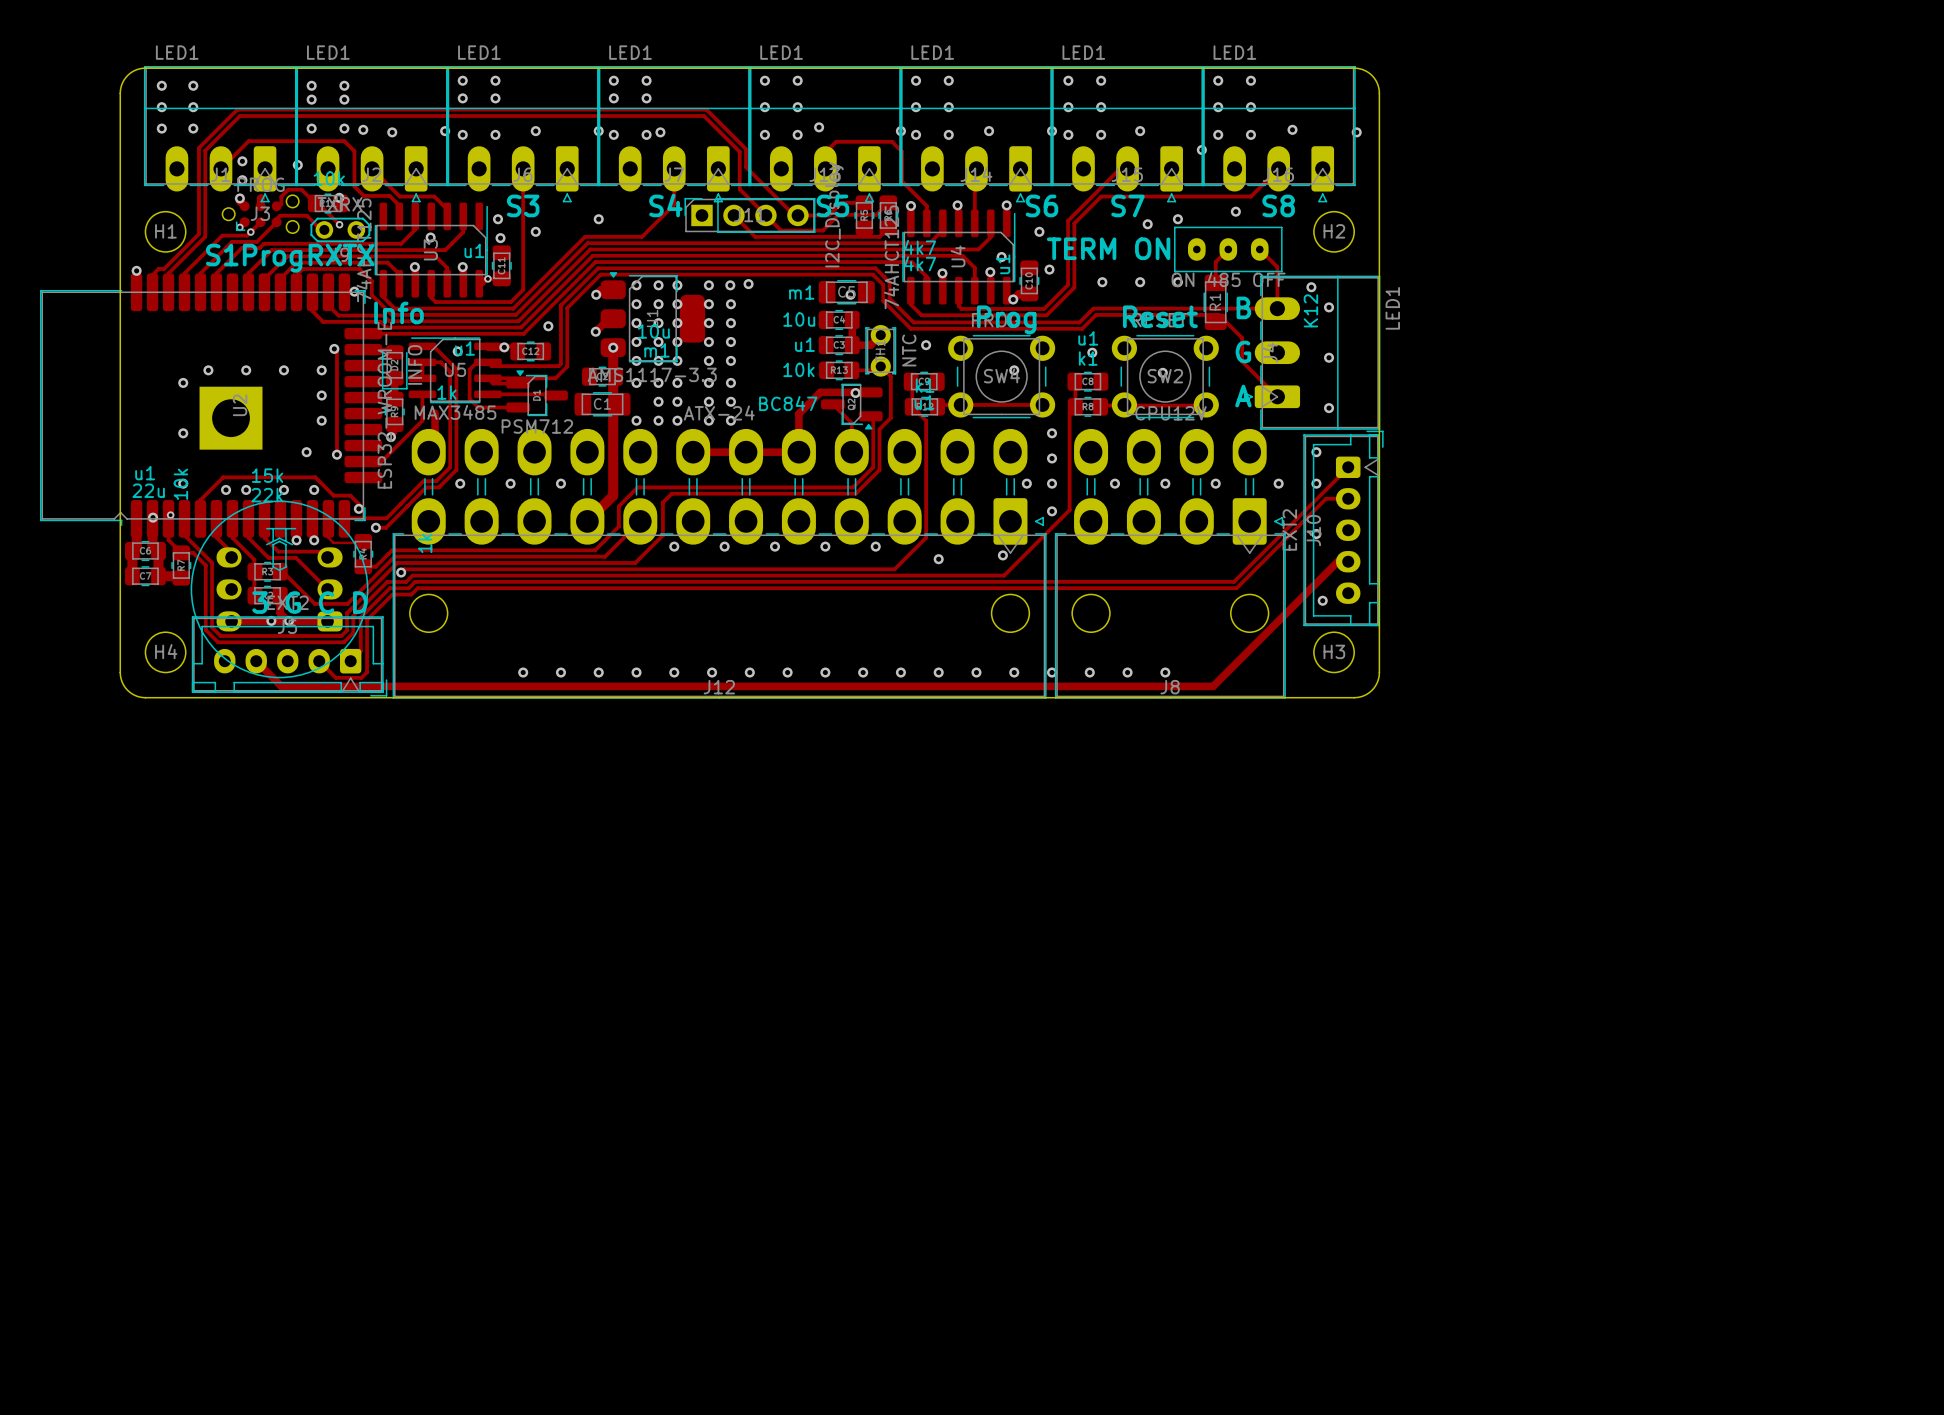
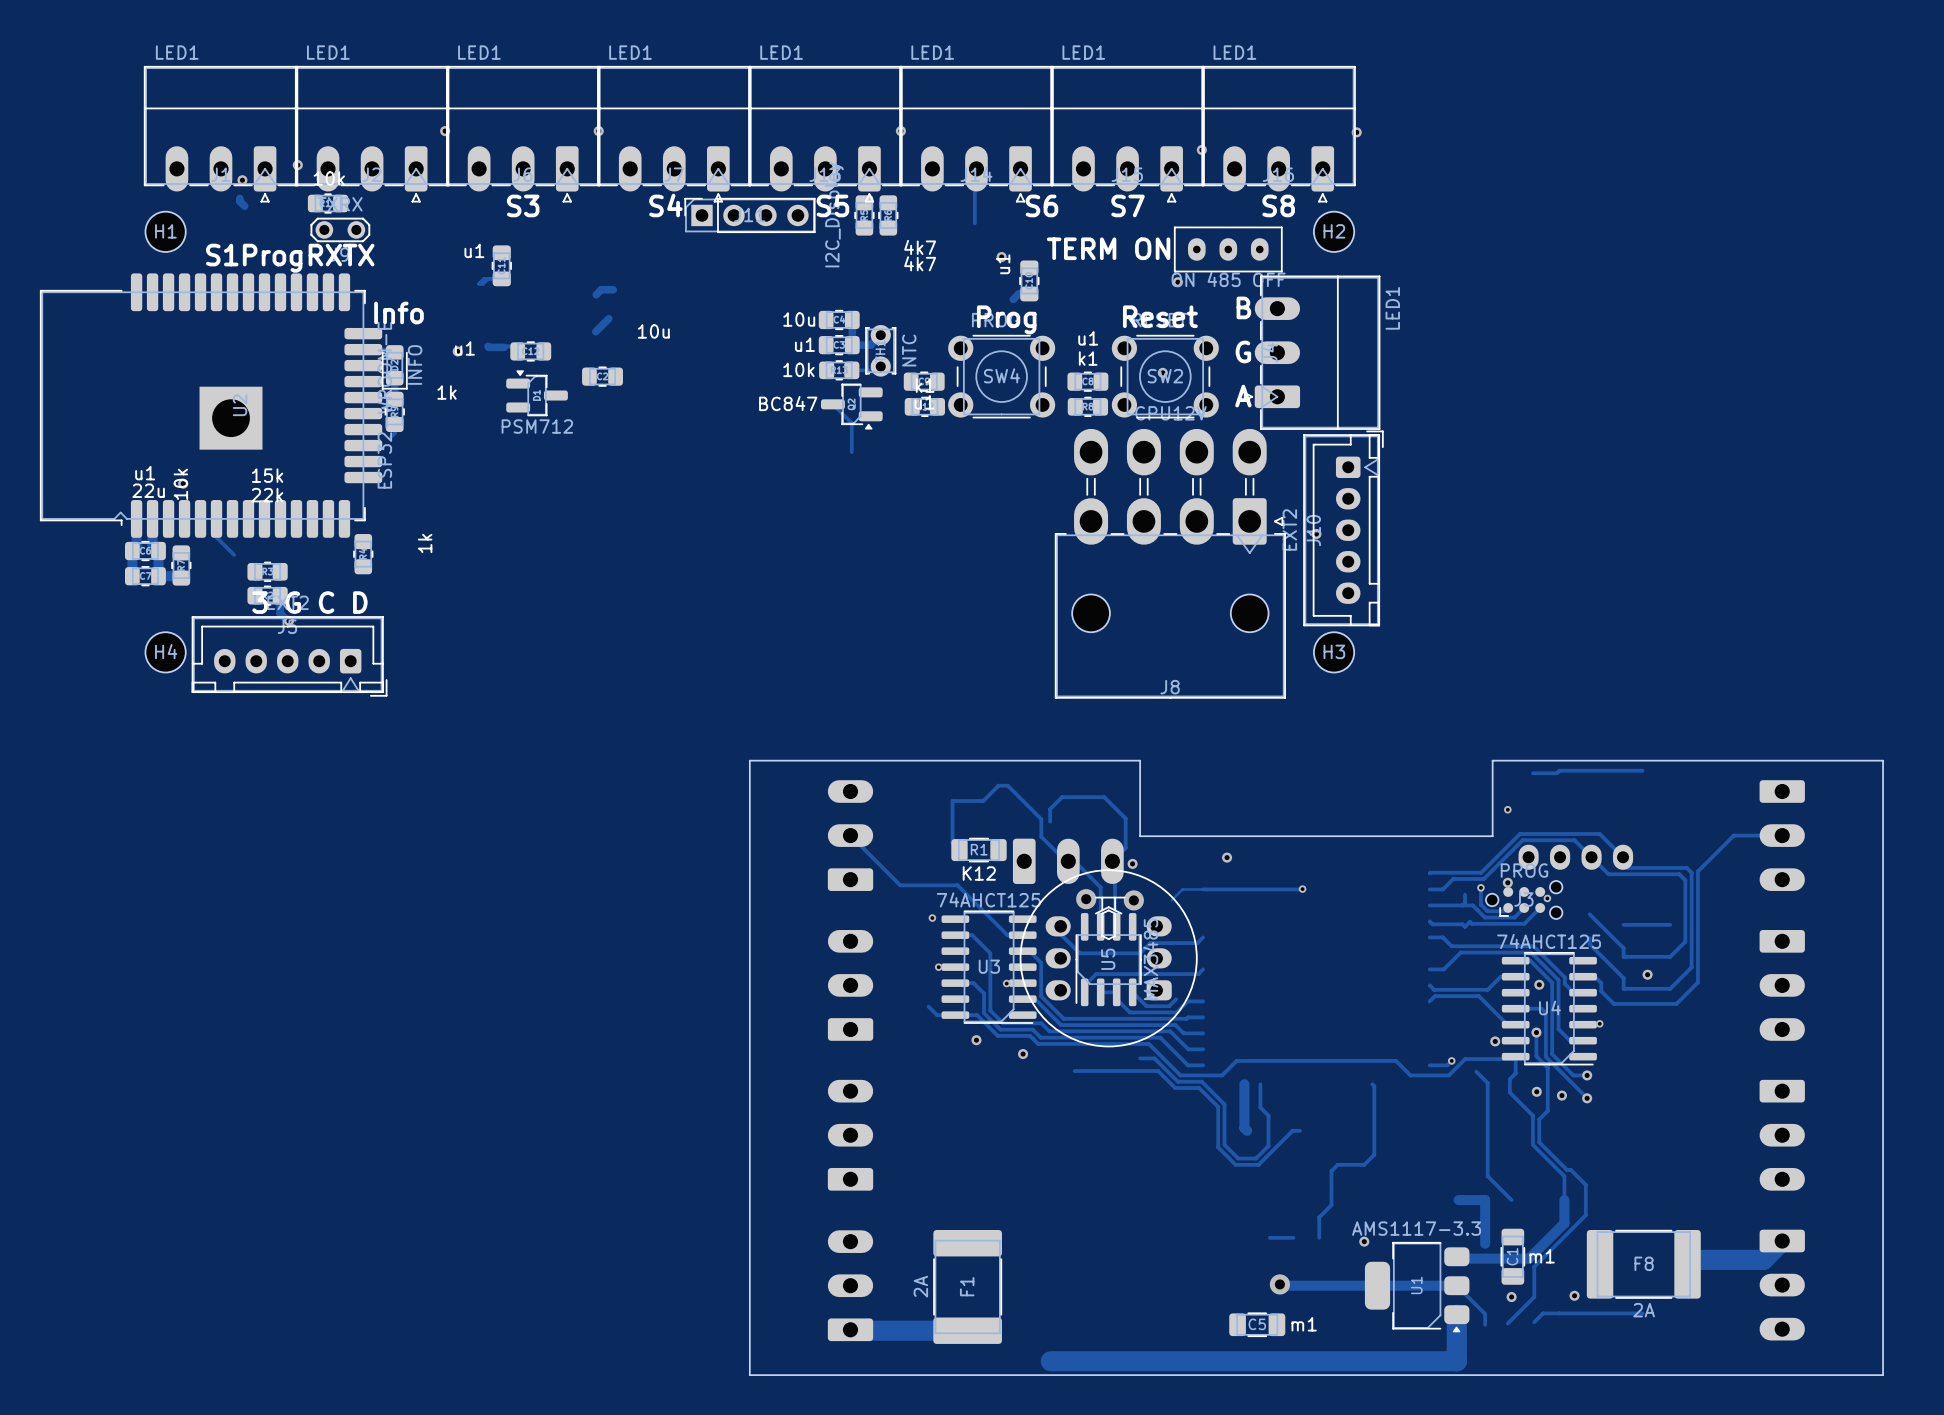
board edge: (145, 68) (1354, 68) (1365, 70) (1375, 79) (1379, 93) (1379, 672) (1376, 683) (1367, 693) (1354, 697) (145, 697) (134, 695) (124, 685) (120, 672) (120, 93) (121, 85) (127, 75) (137, 69) (145, 68) -> none
via: (462, 80) -> none
via: (495, 80) -> none
via: (613, 80) -> none
via: (646, 80) -> none
via: (764, 80) -> none
via: (797, 80) -> none
via: (916, 80) -> none
via: (948, 80) -> none
via: (1068, 80) -> none
via: (1101, 80) -> none
via: (1218, 80) -> none
via: (1250, 80) -> none
via: (161, 85) -> none
via: (193, 85) -> none
via: (311, 85) -> none
via: (344, 85) -> none
via: (462, 98) -> none
via: (495, 98) -> none
via: (613, 98) -> none
via: (646, 98) -> none
via: (311, 99) -> none
via: (344, 99) -> none
via: (161, 107) -> none
via: (193, 107) -> none
via: (764, 107) -> none
via: (797, 107) -> none
via: (916, 107) -> none
via: (948, 107) -> none
via: (1068, 107) -> none
via: (1101, 107) -> none
via: (1218, 107) -> none
via: (1250, 107) -> none
via: (819, 127) -> none
via: (161, 128) -> none
via: (193, 128) -> none
via: (311, 128) -> none
via: (344, 128) -> none
via: (363, 129) -> none
via: (1292, 129) -> none
via: (535, 131) -> none
via: (989, 131) -> none
via: (1052, 131) -> none
via: (1140, 131) -> none
via: (392, 132) -> none
via: (660, 132) -> none
via: (462, 134) -> none
via: (495, 134) -> none
via: (613, 134) -> none
via: (646, 134) -> none
via: (764, 134) -> none
via: (797, 134) -> none
via: (916, 134) -> none
via: (948, 134) -> none
via: (1068, 134) -> none
via: (1101, 134) -> none
via: (1218, 134) -> none
via: (1250, 134) -> none
track: (825, 152) (836, 141) (892, 141) (902, 151) (902, 181) (926, 206) (926, 223) -> none
via: (242, 161) -> none
track: (221, 168) (248, 141) (344, 141) (354, 151) (354, 186) (363, 195) (389, 195) (399, 205) -> none
track: (372, 168) (399, 196) (434, 196) (447, 209) -> none
track: (523, 168) (523, 289) (510, 302) (435, 302) (431, 297) (431, 283) -> none
track: (674, 168) (674, 204) (642, 236) (585, 236) (513, 308) (394, 308) (383, 297) (383, 283) -> none
track: (1120, 168) (1068, 220) (1068, 284) (1044, 308) (961, 308) (958, 306) (958, 290) -> none
track: (1278, 168) (1250, 196) (1101, 196) (1074, 223) (1074, 287) (1046, 315) (921, 315) (910, 304) (910, 290) -> none
track: (261, 197) (260, 206) -> none
via: (339, 197) -> none
via: (239, 198) -> none
track: (864, 202) (841, 202) (829, 215) (797, 215) -> none
track: (888, 202) (876, 214) (838, 214) (822, 230) (781, 230) (739, 189) (739, 151) (703, 115) (239, 115) (205, 150) (205, 236) (168, 273) (168, 292) -> none
track: (315, 203) (301, 189) (288, 189) (281, 196) (281, 204) (279, 206) -> none
track: (318, 203) (339, 224) -> none
via: (957, 205) -> none
via: (1006, 205) -> none
via: (911, 206) -> none
via: (1235, 211) -> none
J3 position: (260, 214) -> (1524, 899)
track: (733, 215) (755, 236) (879, 236) (888, 228) -> none
track: (794, 215) (746, 167) (746, 149) (706, 109) (237, 109) (198, 148) (198, 234) (164, 268) (158, 268) (152, 275) (152, 292) -> none
track: (415, 216) (415, 229) (401, 243) (263, 243) (259, 248) (241, 248) (216, 273) (216, 292) -> none
track: (463, 216) (463, 232) (445, 250) (271, 250) (248, 273) (248, 292) -> none
via: (498, 219) -> none
via: (598, 219) -> none
via: (1177, 219) -> none
track: (260, 222) (247, 235) (222, 235) (184, 273) (184, 292) -> none
track: (273, 222) (279, 215) (306, 215) (321, 229) -> none
track: (276, 222) (256, 241) (232, 241) (200, 273) (200, 292) -> none
track: (990, 223) (990, 237) (978, 249) (590, 249) (518, 321) (389, 321) (383, 315) (338, 315) (328, 305) -> none
via: (339, 224) -> none
via: (1147, 224) -> none
via: (239, 227) -> none
track: (942, 230) (929, 243) (587, 243) (515, 314) (391, 314) (371, 295) (371, 281) (359, 268) (302, 268) (296, 275) -> none
via: (535, 231) -> none
via: (1039, 231) -> none
via: (250, 232) -> none
via: (430, 237) -> none
via: (500, 238) -> none
track: (1228, 249) (1215, 262) (1215, 282) -> none
track: (1259, 249) (1277, 267) (1277, 308) (1093, 308) (1079, 322) (913, 322) (889, 298) (889, 282) (875, 268) (598, 268) (560, 305) (560, 363) (558, 366) (491, 366) (487, 362) -> none
U3 rotation: 0° (431, 250) -> 90° clockwise (989, 967)
U3 position: (431, 250) -> (989, 967)
U4 rotation: 0° (958, 257) -> 90° clockwise (1549, 1008)
U4 position: (958, 257) -> (1549, 1008)
via: (414, 267) -> none
via: (462, 267) -> none
via: (1049, 269) -> none
via: (136, 270) -> none
via: (990, 272) -> none
track: (398, 273) (387, 262) (296, 262) (280, 278) -> none
via: (942, 273) -> none
via: (487, 278) -> none
track: (264, 279) (287, 256) (435, 256) (447, 267) (447, 283) -> none
via: (1102, 282) -> none
via: (1140, 282) -> none
via: (748, 284) -> none
via: (636, 285) -> none
via: (658, 285) -> none
via: (677, 285) -> none
via: (708, 285) -> none
via: (730, 285) -> none
via: (1311, 287) -> none
track: (926, 290) (926, 276) (912, 262) (595, 262) (523, 333) (363, 333) -> none
track: (974, 290) (974, 267) (962, 255) (592, 255) (521, 327) (386, 327) (380, 321) (323, 321) (312, 311) (312, 292) -> none
via: (354, 291) -> none
C5 value position: m1 (801, 292) -> m1 (1304, 1324)
C5 position: (846, 292) -> (1257, 1324)
via: (596, 294) -> none
via: (850, 294) -> none
via: (1013, 299) -> none
R1 rotation: 0° (1215, 302) -> 90° clockwise (978, 850)
R1 position: (1215, 302) -> (978, 850)
via: (636, 304) -> none
via: (658, 304) -> none
via: (677, 304) -> none
via: (708, 304) -> none
via: (730, 304) -> none
via: (1329, 307) -> none
R1 value position: K12 (1310, 310) -> K12 (979, 873)
U1 rotation: 0° (652, 317) -> 180° (1417, 1287)
U1 position: (652, 317) -> (1417, 1287)
via: (636, 323) -> none
via: (658, 323) -> none
via: (677, 323) -> none
via: (708, 323) -> none
via: (730, 323) -> none
via: (548, 326) -> none
via: (595, 331) -> none
via: (636, 342) -> none
via: (658, 342) -> none
via: (677, 342) -> none
via: (708, 342) -> none
via: (730, 342) -> none
via: (926, 345) -> none
track: (433, 346) (456, 369) (456, 469) (438, 487) (426, 487) (407, 506) -> none
via: (504, 347) -> none
track: (613, 347) (613, 495) (587, 521) -> none
via: (613, 347) -> none
track: (334, 348) (336, 351) (336, 454) -> none
via: (334, 348) -> none
C1 value position: m1 (656, 350) -> m1 (1542, 1256)
via: (1092, 352) -> none
via: (1329, 357) -> none
via: (636, 360) -> none
via: (658, 360) -> none
via: (677, 360) -> none
via: (708, 360) -> none
via: (730, 360) -> none
track: (477, 362) (469, 369) (469, 398) (478, 407) (518, 407) -> none
track: (880, 366) (890, 376) (890, 417) (879, 429) (879, 469) (855, 493) (671, 493) (662, 502) (662, 535) (635, 562) (397, 562) (350, 610) -> none
via: (208, 370) -> none
via: (246, 370) -> none
via: (283, 370) -> none
via: (321, 370) -> none
U5 rotation: 0° (455, 370) -> 90° counterclockwise (1108, 959)
U5 position: (455, 370) -> (1108, 959)
via: (1014, 370) -> none
track: (422, 378) (422, 362) (440, 362) (450, 371) (450, 467) (436, 481) (423, 481) (401, 503) -> none
via: (183, 382) -> none
via: (636, 382) -> none
via: (658, 382) -> none
via: (677, 382) -> none
via: (708, 382) -> none
via: (730, 382) -> none
track: (912, 382) (912, 406) (926, 420) (926, 537) (894, 569) (404, 569) (401, 572) -> none
track: (1075, 382) (1075, 406) (1069, 412) (1069, 510) (1004, 575) (412, 575) (406, 581) (387, 581) (353, 615) (353, 632) (343, 642) (218, 642) (205, 630) (205, 565) (193, 552) (181, 552) (168, 540) (168, 518) -> none
track: (518, 383) (493, 383) (487, 378) (555, 378) (567, 366) (567, 308) (600, 274) (872, 274) (883, 284) (883, 301) (911, 328) (1082, 328) (1096, 314) (1219, 314) (1242, 338) (1242, 361) (1277, 396) -> none
track: (870, 392) (820, 392) (798, 413) (798, 452) (693, 452) -> none
via: (855, 393) -> none
track: (422, 394) (422, 420) (381, 461) (363, 461) -> none
track: (487, 394) (554, 394) -> none
via: (321, 395) -> none
via: (658, 401) -> none
via: (677, 401) -> none
via: (708, 401) -> none
via: (730, 401) -> none
C1 rotation: 0° (602, 404) -> 90° clockwise (1512, 1256)
C1 position: (602, 404) -> (1512, 1256)
track: (939, 404) (1042, 404) -> none
track: (1101, 405) (1216, 405) -> none
via: (1329, 408) -> none
track: (435, 413) (435, 445) -> none
track: (873, 418) (873, 467) (853, 487) (637, 487) (618, 506) (618, 526) (595, 550) (392, 550) (375, 566) (363, 566) -> none
via: (321, 420) -> none
via: (636, 420) -> none
via: (658, 420) -> none
via: (677, 420) -> none
via: (708, 420) -> none
via: (730, 420) -> none
via: (183, 433) -> none
via: (1052, 433) -> none
via: (390, 437) -> none
via: (306, 452) -> none
via: (1316, 452) -> none
via: (336, 454) -> none
via: (1052, 458) -> none
track: (1348, 467) (1234, 581) (415, 581) (408, 588) (389, 588) (360, 617) (360, 651) (350, 661) -> none
via: (460, 483) -> none
via: (510, 483) -> none
via: (560, 483) -> none
via: (1026, 483) -> none
via: (1052, 483) -> none
via: (1114, 483) -> none
via: (1165, 483) -> none
via: (1215, 483) -> none
via: (1278, 483) -> none
via: (1316, 483) -> none
via: (226, 489) -> none
via: (246, 489) -> none
via: (283, 489) -> none
via: (314, 489) -> none
track: (1348, 498) (1326, 498) (1236, 588) (417, 588) (411, 594) (392, 594) (367, 619) (367, 672) (361, 677) (335, 677) (319, 661) -> none
track: (401, 503) (386, 518) (345, 518) -> none
track: (407, 506) (386, 527) (375, 527) -> none
track: (358, 508) (358, 504) (350, 495) (333, 495) (315, 477) (223, 477) (200, 500) (200, 518) -> none
via: (358, 508) -> none
via: (1052, 511) -> none
via: (170, 515) -> none
via: (153, 517) -> none
track: (232, 518) (232, 537) (254, 559) (254, 588) -> none
track: (248, 518) (248, 537) (268, 557) (296, 557) (327, 589) -> none
track: (264, 518) (264, 537) (278, 551) (321, 551) (327, 557) -> none
track: (328, 518) (328, 537) (333, 542) (363, 541) -> none
track: (640, 521) (605, 556) (394, 556) (347, 603) (314, 603) (282, 571) (280, 571) -> none
via: (375, 527) -> none
track: (184, 535) (212, 562) (212, 627) (220, 636) (341, 636) (347, 630) (347, 613) (350, 610) -> none
via: (296, 540) -> none
via: (314, 540) -> none
via: (674, 546) -> none
via: (724, 546) -> none
via: (775, 546) -> none
via: (825, 546) -> none
via: (875, 546) -> none
via: (1002, 555) -> none
via: (938, 559) -> none
track: (1348, 561) (1337, 561) (1213, 686) (281, 686) (256, 661) -> none
J12: ATX-24 (719, 563) -> none
via: (401, 572) -> none
part: (279, 589) -> none
via: (1322, 600) -> none
via: (271, 620) -> none
track: (231, 621) (327, 621) -> none
via: (523, 672) -> none
via: (560, 672) -> none
via: (598, 672) -> none
via: (636, 672) -> none
via: (674, 672) -> none
via: (712, 672) -> none
via: (749, 672) -> none
via: (787, 672) -> none
via: (825, 672) -> none
via: (863, 672) -> none
via: (900, 672) -> none
via: (938, 672) -> none
via: (976, 672) -> none
via: (1014, 672) -> none
via: (1052, 672) -> none
via: (1089, 672) -> none
via: (1127, 672) -> none
via: (1165, 672) -> none
board edge: none -> (749, 760) (1140, 760) (1140, 836) (1492, 836) (1492, 760) (1883, 760) (1883, 1375) (749, 1375) (749, 760)
track: none -> (1642, 770) (1559, 770) (1556, 773) (1533, 773)
via: none -> (1507, 809)
track: none -> (1050, 821) (1050, 809) (1062, 797) (1104, 797) (1125, 818) (1125, 848) (1112, 861) (1114, 863) (1114, 925) (1116, 926)
track: none -> (850, 835) (900, 885) (957, 885) (1007, 935) (1022, 935)
part: none -> (850, 835)
track: none -> (1782, 835) (1733, 835) (1697, 871) (1697, 982) (1676, 1003) (1613, 1003) (1601, 991) (1601, 983) (1594, 976) (1583, 976)
part: none -> (1782, 835)
track: none -> (959, 850) (952, 843) (952, 800) (983, 800) (998, 785) (1007, 785) (1041, 819) (1041, 836) (1065, 861) (1074, 861) (1100, 887) (1100, 926)
via: none -> (1227, 857)
part: none -> (1575, 857)
part: none -> (1068, 861)
via: none -> (1132, 863)
track: none -> (1429, 873) (1481, 872) (1519, 833) (1599, 833) (1623, 857) (1623, 863) (1627, 867) (1686, 867) (1691, 872) (1691, 967) (1670, 988) (1623, 988) (1623, 978) (1589, 944) (1589, 938)
via: none -> (1507, 882)
track: none -> (1480, 887) (1480, 904) (1487, 911) (1504, 911) (1508, 907)
via: none -> (1480, 887)
track: none -> (1302, 889) (1182, 889) (1171, 900)
via: none -> (1302, 889)
track: none -> (1429, 889) (1442, 889) (1453, 879) (1483, 879) (1522, 840) (1574, 840) (1608, 874) (1679, 874) (1685, 880) (1685, 941) (1670, 956) (1623, 956) (1623, 948) (1589, 914)
track: none -> (1465, 894) (1465, 902) (1462, 905)
via: none -> (1547, 898)
via: none -> (1086, 899)
via: none -> (1133, 900)
track: none -> (1429, 905) (1472, 905) (1484, 917) (1514, 917) (1524, 907)
track: none -> (1540, 907) (1524, 923) (1471, 923) (1469, 921) (1465, 926) (1462, 924) (1432, 924) (1429, 921)
via: none -> (932, 918)
track: none -> (1623, 924) (1670, 924)
track: none -> (1060, 926) (1060, 934) (1079, 953) (1140, 953) (1150, 943) (1197, 943) (1203, 937)
track: none -> (955, 935) (972, 935) (990, 953) (990, 1010) (1003, 1023) (1041, 1023) (1049, 1031) (1170, 1031) (1188, 1049) (1203, 1049)
track: none -> (1429, 937) (1442, 937) (1451, 946) (1533, 946) (1564, 977) (1564, 983) (1573, 992) (1583, 992)
track: none -> (1022, 951) (1029, 951) (1041, 962) (1041, 996) (1063, 1018) (1203, 1017)
part: none -> (1108, 958)
track: none -> (1515, 960) (1530, 960) (1552, 982) (1552, 1054) (1573, 1075) (1587, 1075)
via: none -> (938, 967)
track: none -> (1203, 969) (1198, 974) (1096, 974) (1084, 985) (1084, 992)
track: none -> (1429, 969) (1443, 969) (1460, 952) (1530, 952) (1558, 980) (1558, 1029) (1570, 1040) (1583, 1040)
via: none -> (1647, 974)
track: none -> (1515, 976) (1500, 976) (1487, 989) (1434, 989) (1429, 985)
track: none -> (955, 983) (973, 983) (984, 993) (984, 1013) (1000, 1029) (1032, 1029) (1040, 1037) (1160, 1037) (1188, 1065) (1203, 1065)
via: none -> (1006, 983)
via: none -> (1539, 984)
part: none -> (850, 985)
part: none -> (1782, 985)
track: none -> (1100, 992) (1116, 992) (1116, 999) (1130, 1012) (1176, 1012) (1187, 1001) (1203, 1001)
track: none -> (1132, 992) (1146, 1006) (1169, 1006) (1176, 999)
track: none -> (1022, 999) (1035, 999) (1061, 1025) (1175, 1025) (1183, 1033) (1203, 1033)
track: none -> (1429, 1001) (1434, 996) (1478, 996) (1507, 1024) (1515, 1024)
track: none -> (928, 1006) (937, 1015) (977, 1015) (997, 1035) (1030, 1035) (1038, 1043) (1148, 1043) (1180, 1075) (1222, 1075) (1236, 1060) (1396, 1060) (1410, 1075) (1448, 1075) (1465, 1059) (1513, 1059) (1515, 1056)
track: none -> (1515, 1008) (1541, 1008) (1545, 1012) (1545, 1056) (1587, 1098)
via: none -> (1599, 1023)
track: none -> (1536, 1032) (1536, 1056) (1547, 1067) (1547, 1110) (1539, 1119) (1539, 1142) (1567, 1170) (1570, 1170) (1585, 1184) (1585, 1215) (1534, 1266) (1534, 1297) (1507, 1323)
via: none -> (1536, 1032)
via: none -> (976, 1040)
via: none -> (1495, 1041)
via: none -> (1023, 1054)
track: none -> (1515, 1056) (1515, 1073) (1509, 1079) (1509, 1092) (1532, 1115) (1532, 1144) (1564, 1176) (1564, 1223) (1529, 1258) (1458, 1258) (1456, 1256)
track: none -> (1140, 1058) (1154, 1058) (1177, 1081) (1201, 1081) (1224, 1104) (1224, 1144) (1238, 1158) (1255, 1158) (1268, 1146) (1268, 1115) (1260, 1107) (1260, 1084)
track: none -> (1451, 1060) (1447, 1065) (1429, 1065)
via: none -> (1451, 1060)
track: none -> (1074, 1071) (1158, 1071) (1175, 1088) (1199, 1088) (1218, 1107) (1218, 1147) (1235, 1164) (1258, 1164) (1292, 1130) (1300, 1130)
track: none -> (1476, 1071) (1487, 1082) (1487, 1176) (1511, 1200)
via: none -> (1587, 1075)
track: none -> (1244, 1084) (1244, 1128) (1247, 1130)
track: none -> (1372, 1084) (1374, 1086) (1374, 1154) (1364, 1164) (1337, 1164) (1331, 1171) (1331, 1205) (1319, 1217) (1319, 1237)
via: none -> (1536, 1091)
via: none -> (1561, 1095)
via: none -> (1587, 1098)
part: none -> (850, 1135)
part: none -> (1782, 1135)
track: none -> (1458, 1200) (1485, 1200) (1485, 1243)
track: none -> (1269, 1237) (1293, 1237)
via: none -> (1364, 1241)
track: none -> (1782, 1241) (1763, 1259) (1691, 1259) (1687, 1264)
F8: none -> 2A (1643, 1264)
track: none -> (1279, 1284) (1456, 1285) (1485, 1314) (1485, 1324)
via: none -> (1279, 1284)
part: none -> (850, 1285)
part: none -> (1782, 1285)
F1: none -> 2A (967, 1286)
via: none -> (1574, 1295)
via: none -> (1511, 1297)
track: none -> (1642, 1313) (1543, 1313) (1534, 1322)
track: none -> (1456, 1314) (1456, 1361) (1050, 1361)
track: none -> (850, 1329) (967, 1330)

